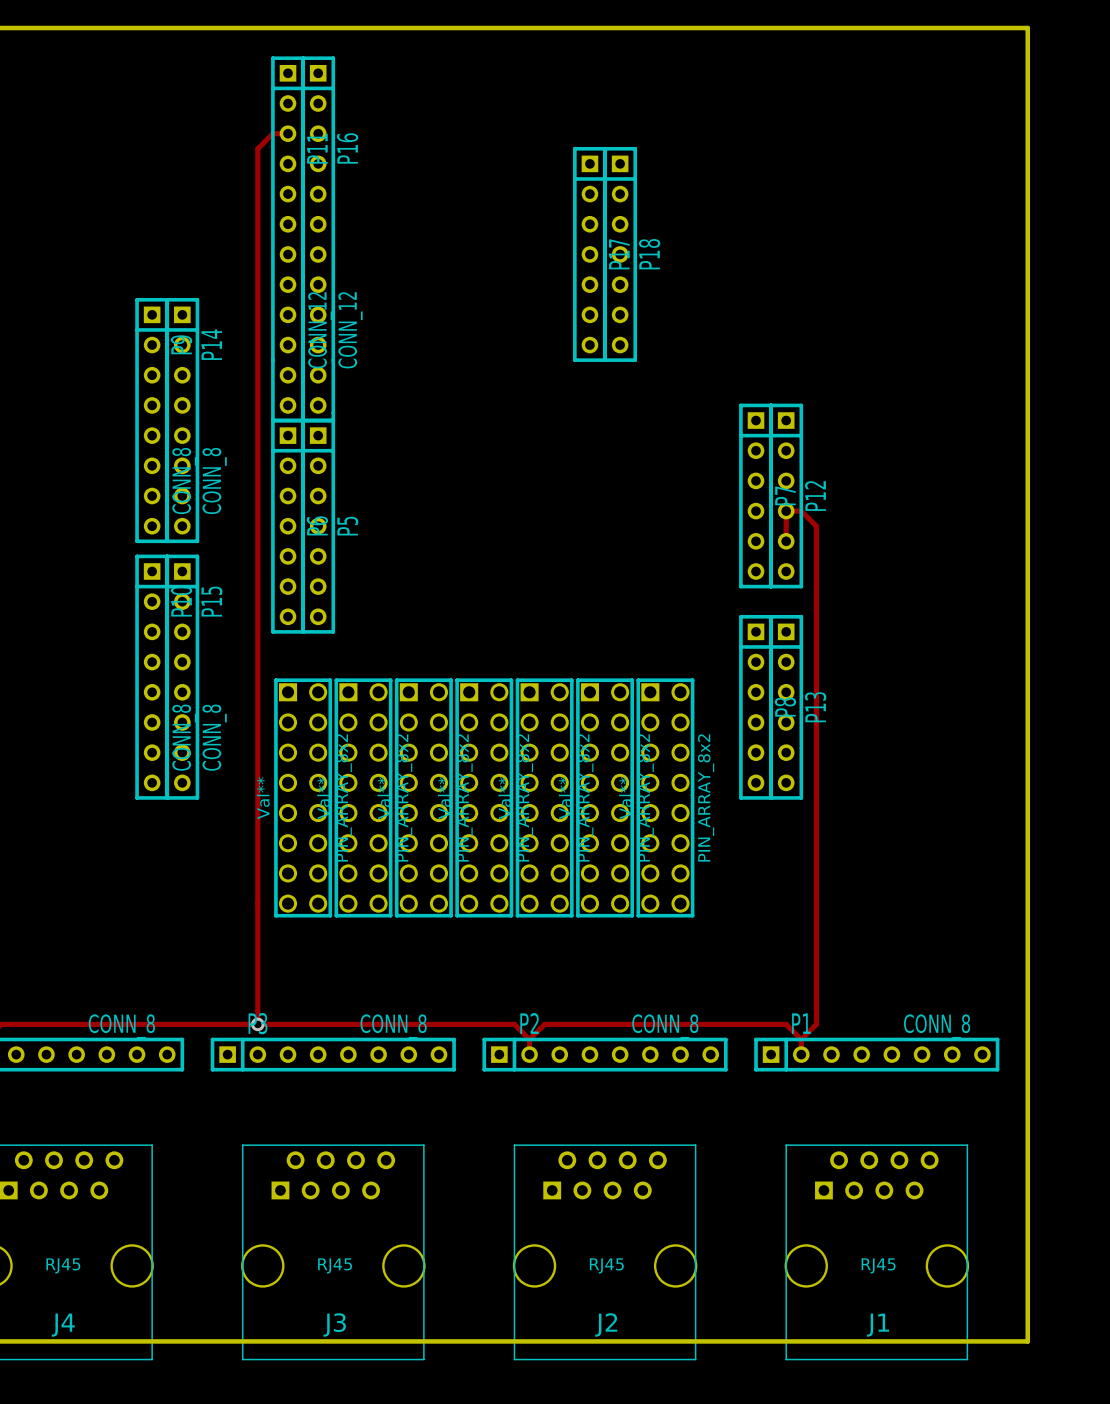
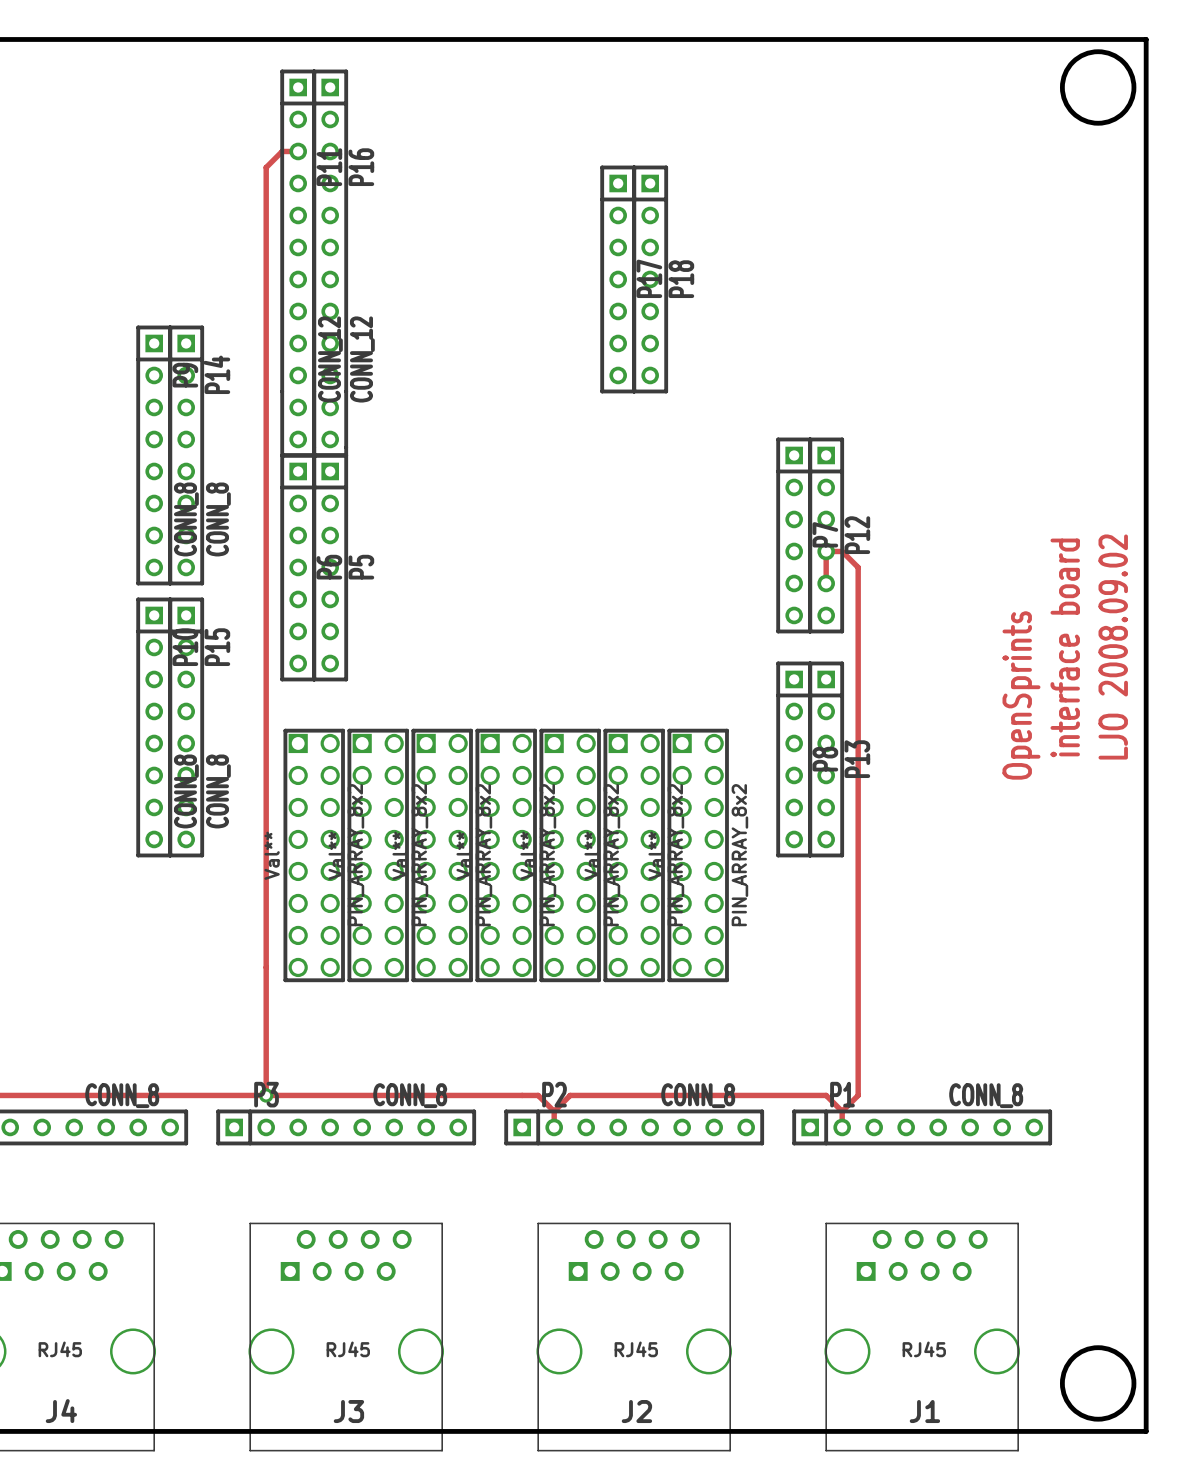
board edge: (1027, 28) (1027, 1341) -> (1082, 39) (1146, 39) (1146, 1431) (1082, 1431)
round board edge: none -> [1059, 49, 1137, 126]
text: none -> interface board (1065, 647)
text: none -> LJO 2008.09.02 (1113, 647)
text: none -> OpenSprints (1021, 695)
round board edge: none -> [1059, 1345, 1137, 1422]

